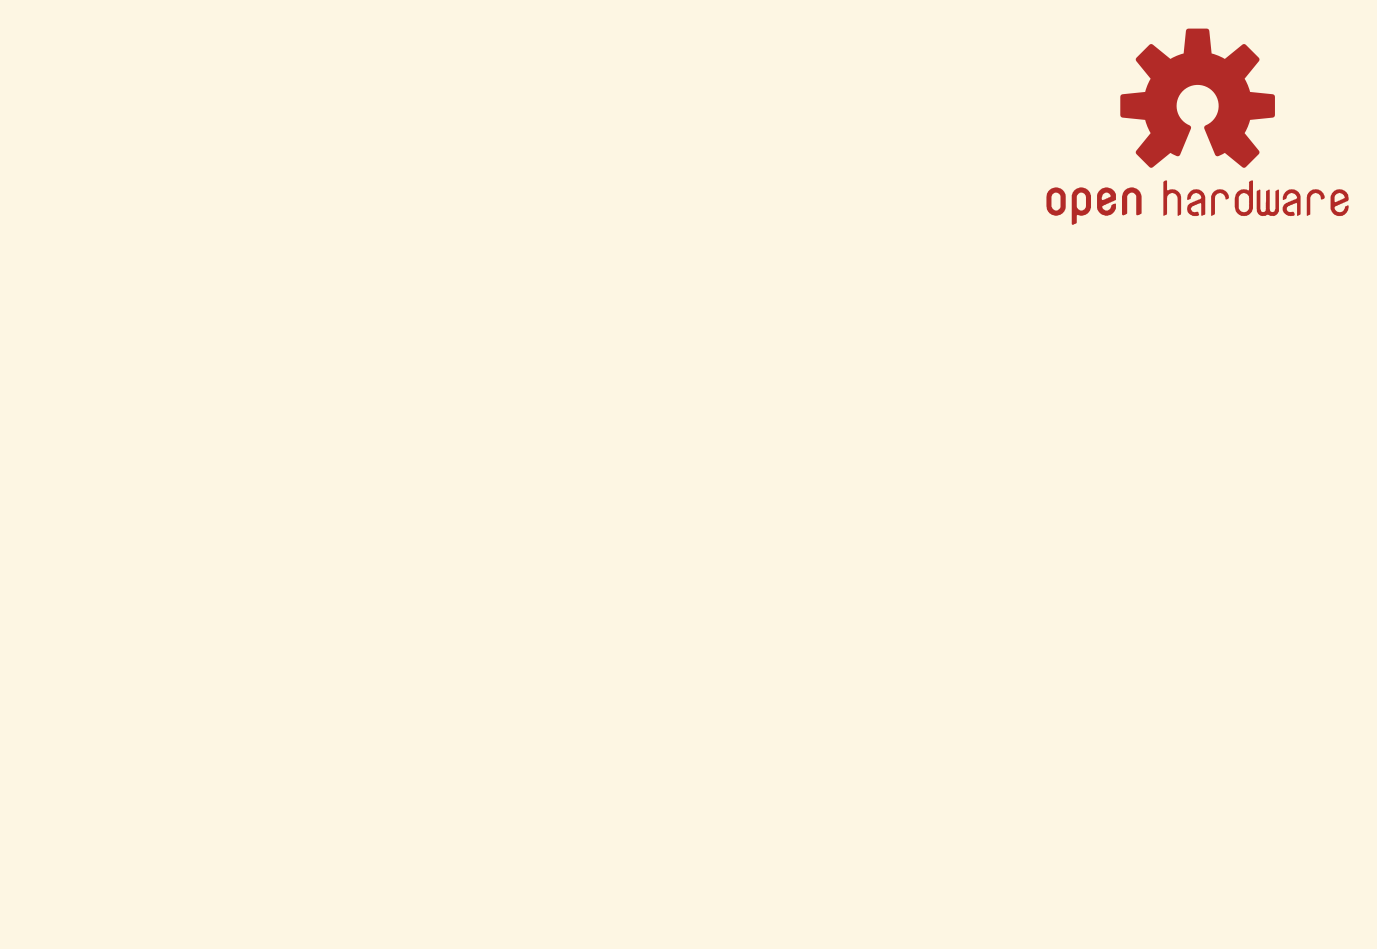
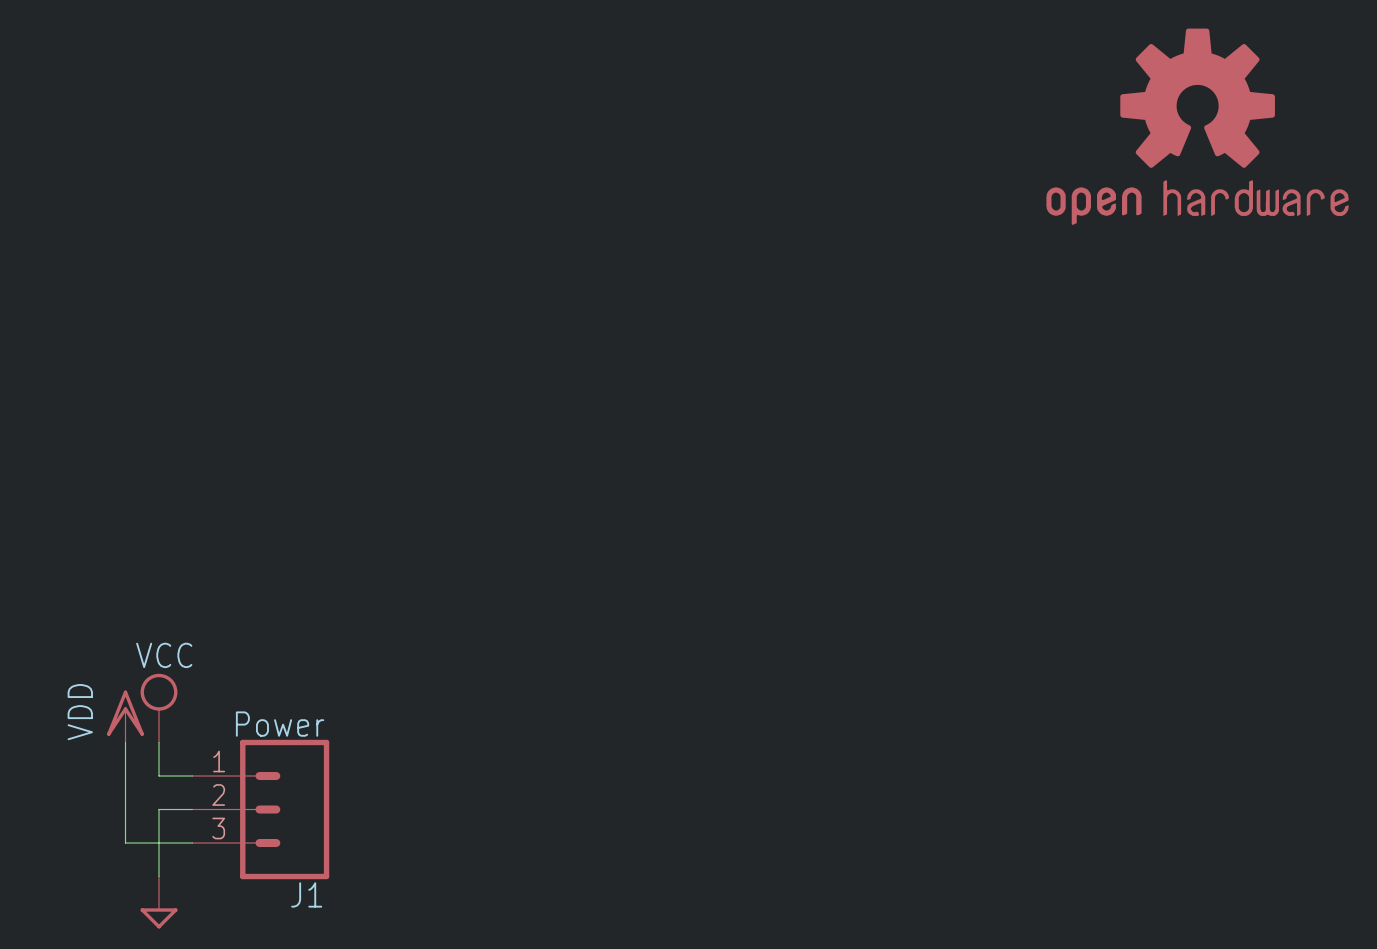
power symbol: none -> VCC (159, 708)
power symbol: none -> VDD (125, 716)
wire: none -> (125, 742) (125, 843) (192, 843)
wire: none -> (159, 742) (159, 776) (192, 776)
wire: none -> (192, 809) (159, 809) (159, 876)
J1: none -> Power (260, 809)
power symbol: none -> (159, 902)

